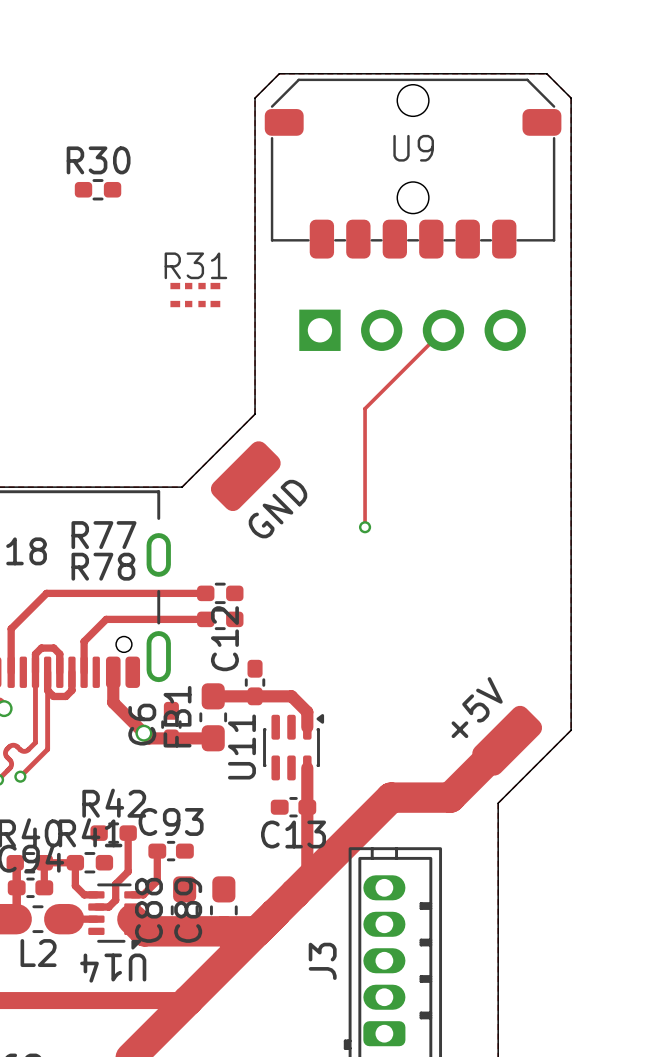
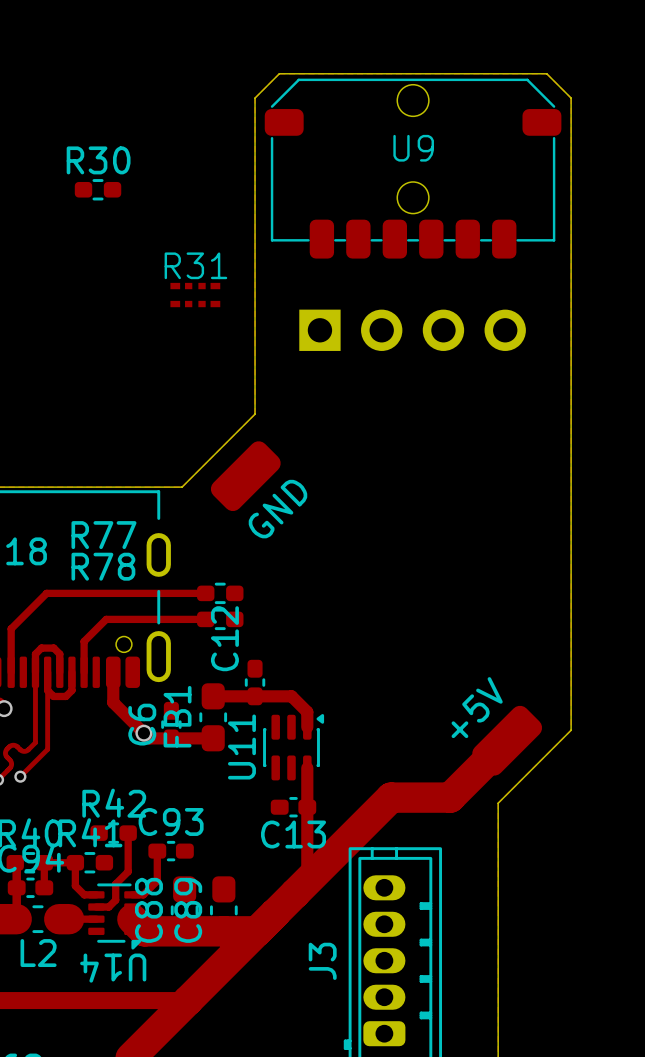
track: (443, 330) (365, 408) (365, 527) -> none
via: (365, 527) -> none

